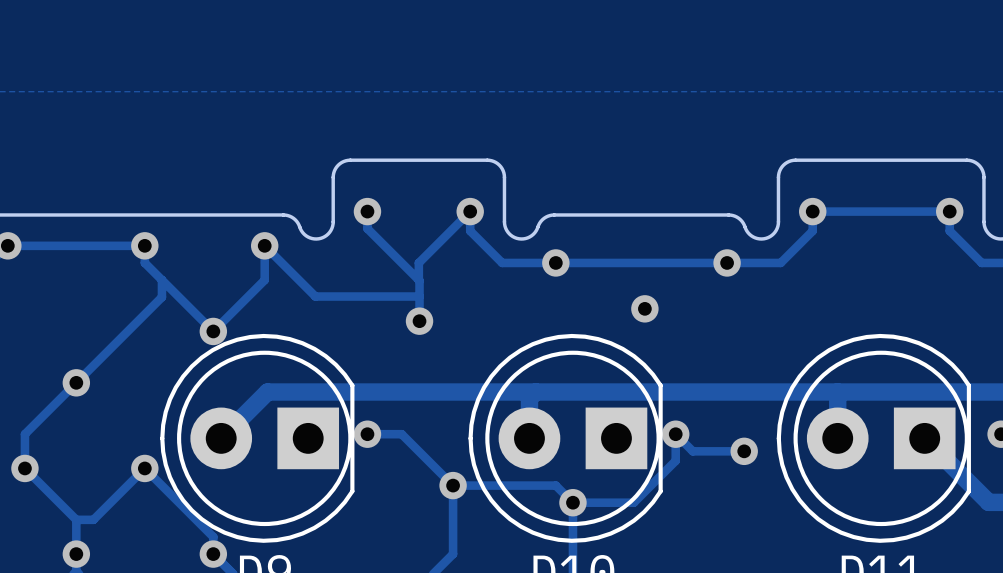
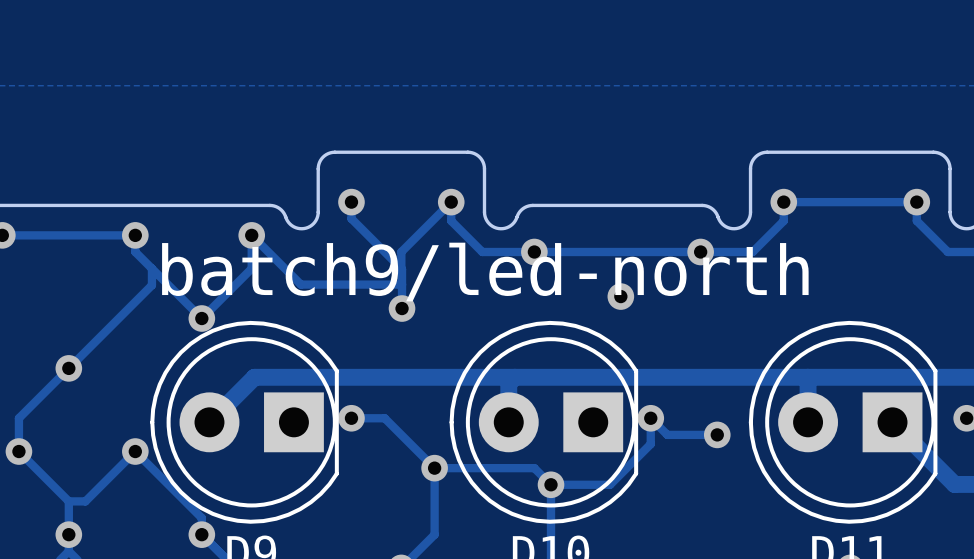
text: none -> batch9/led-north (485, 272)

